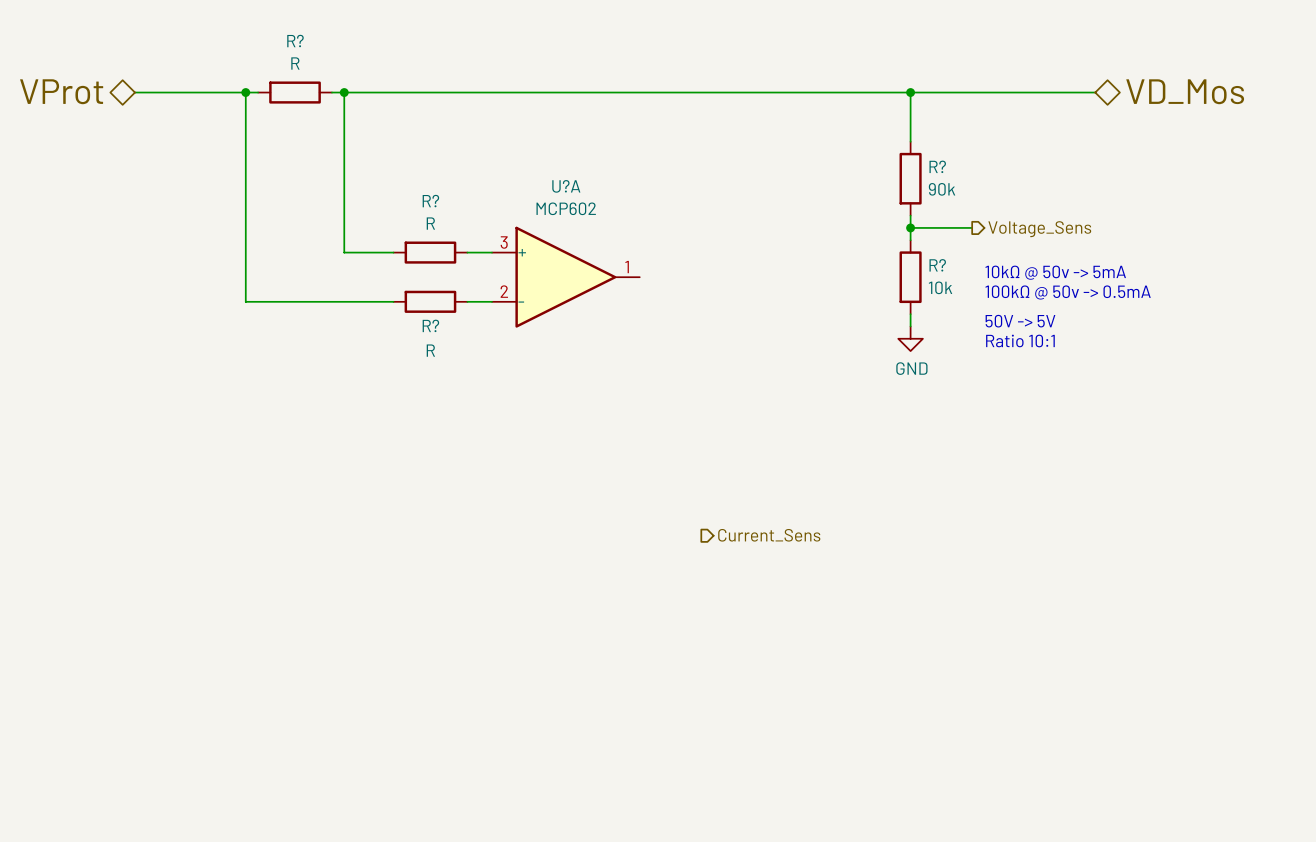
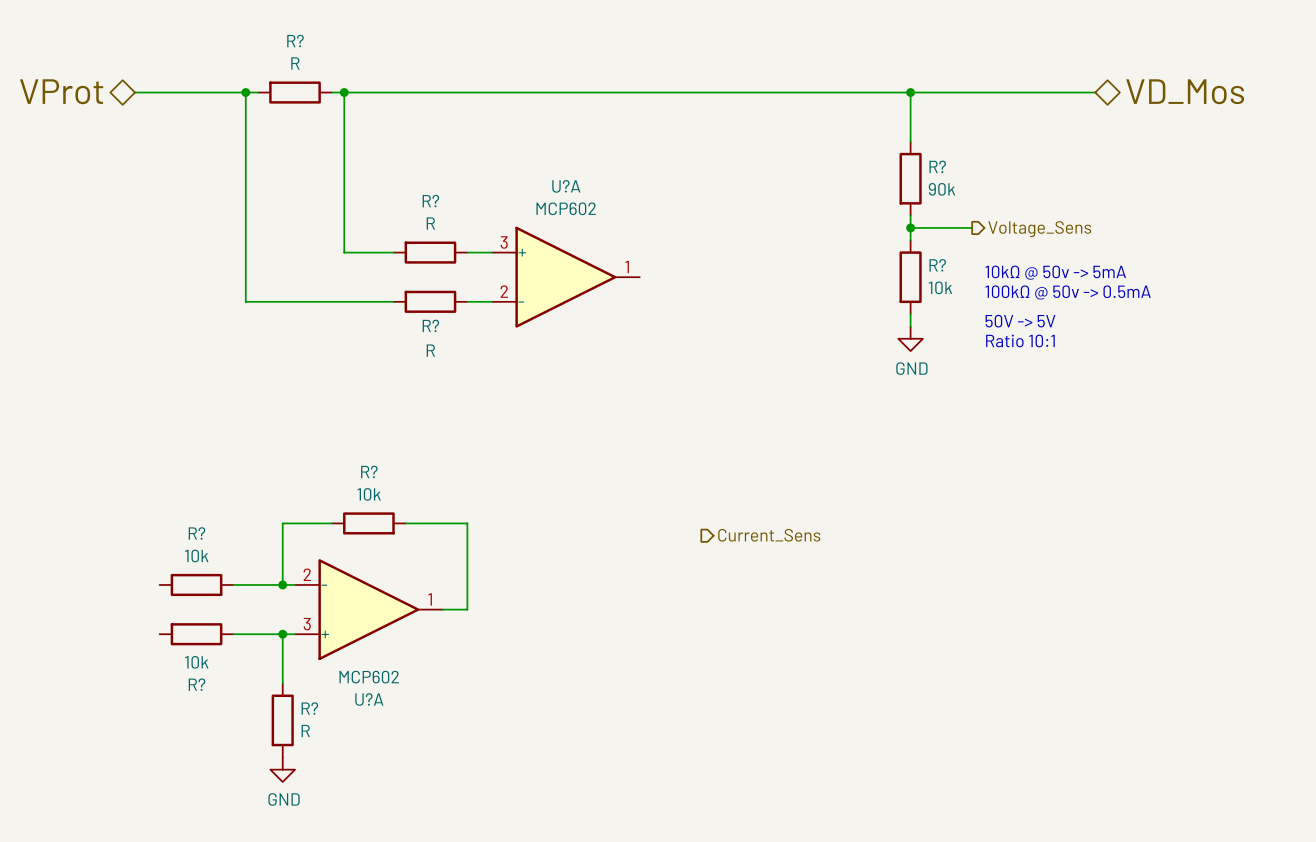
wire: none -> (331, 523) (282, 523) (282, 584)
R?: none -> 10k (368, 523)
wire: none -> (405, 523) (467, 523) (467, 609) (442, 609)
R?: none -> 10k (196, 584)
wire: none -> (233, 584) (295, 584)
junction: none -> (282, 584)
U?A: none -> MCP602 (368, 609)
R?: none -> 10k (196, 634)
wire: none -> (233, 634) (295, 634)
wire: none -> (282, 634) (282, 683)
junction: none -> (282, 634)
R?: none -> R (282, 720)
power symbol: none -> GND (282, 769)

